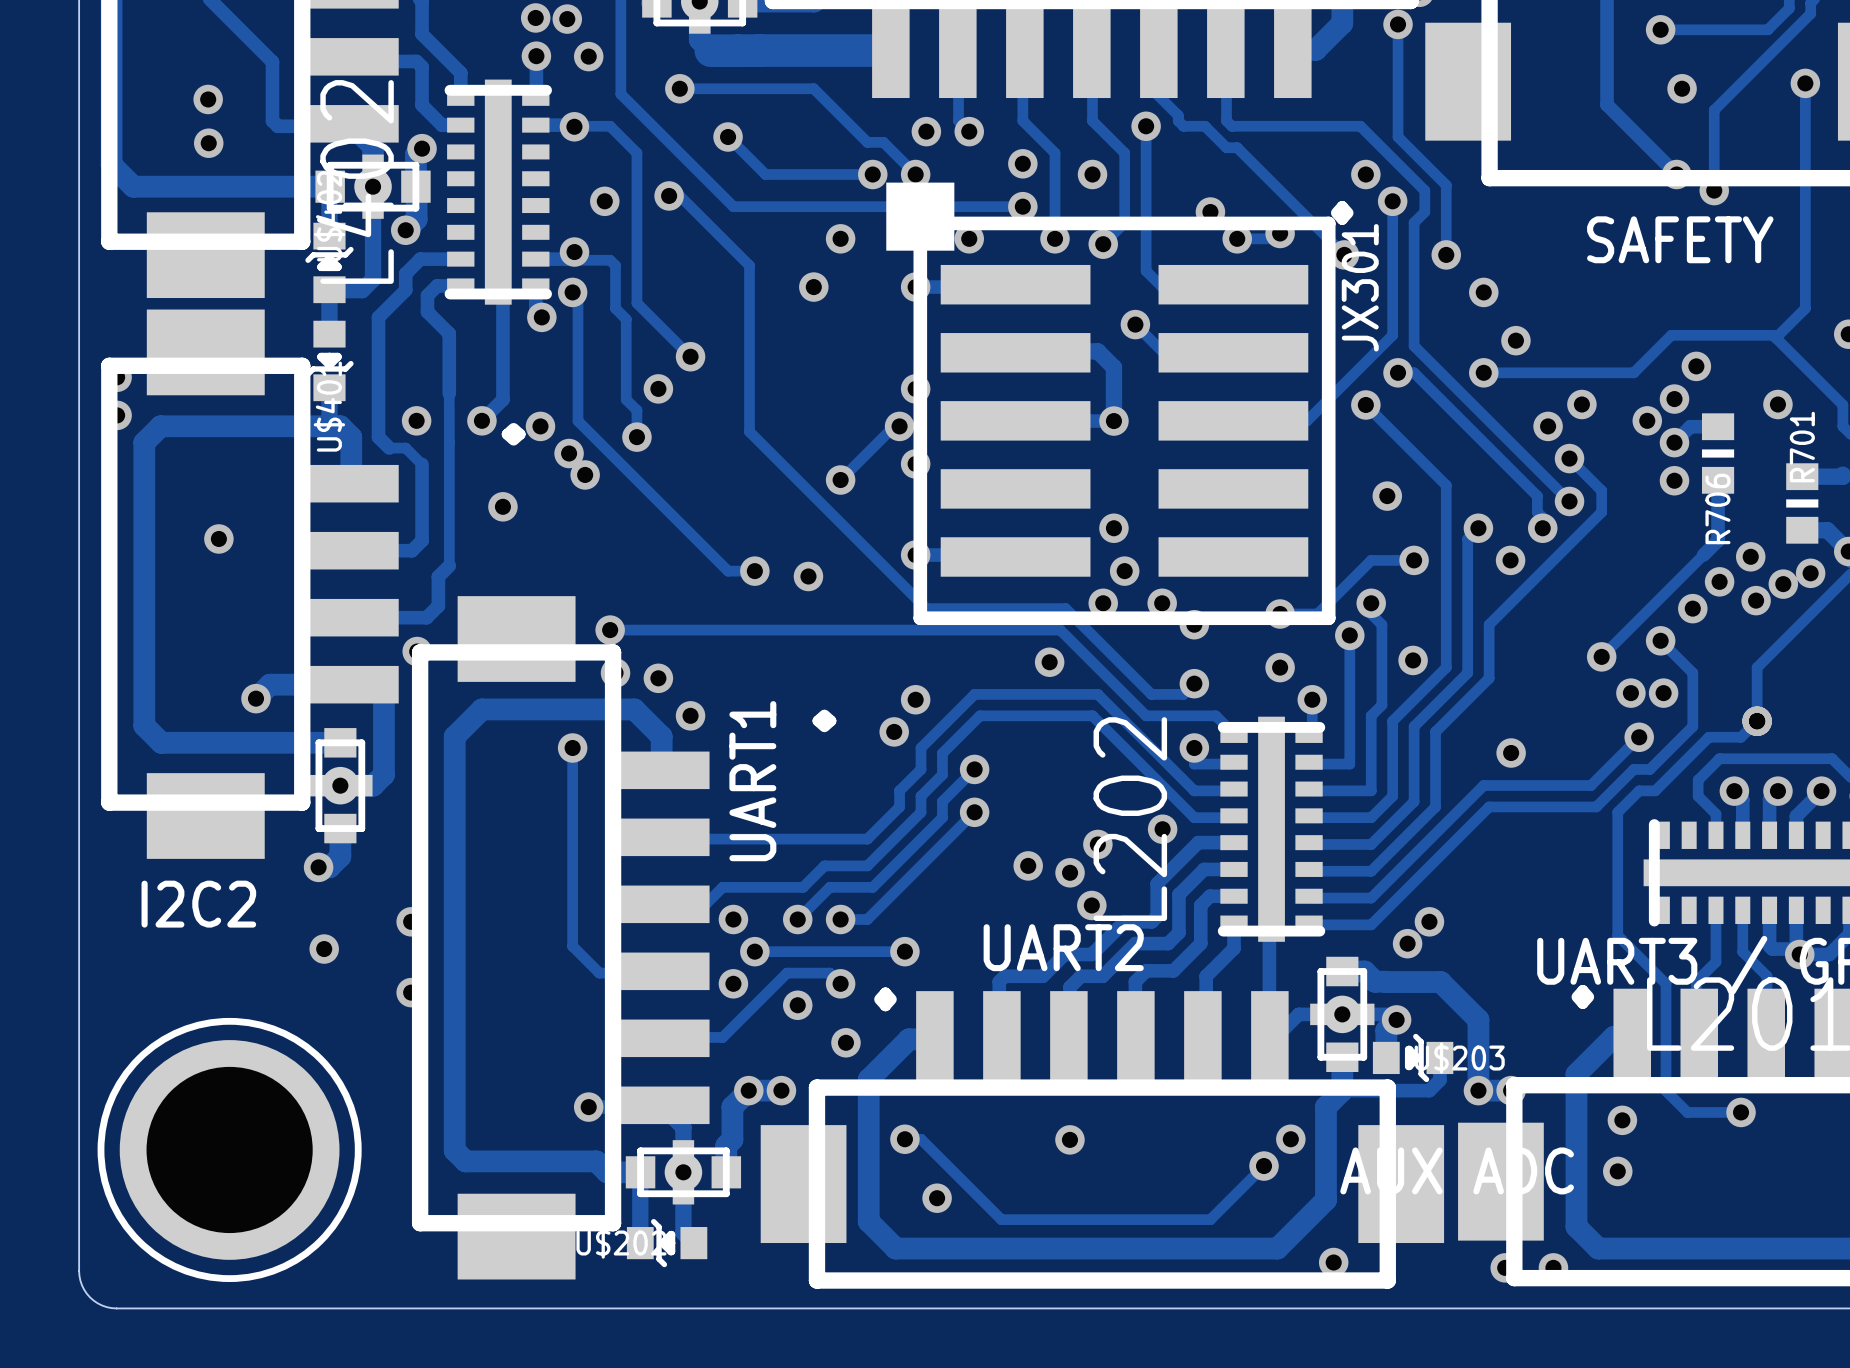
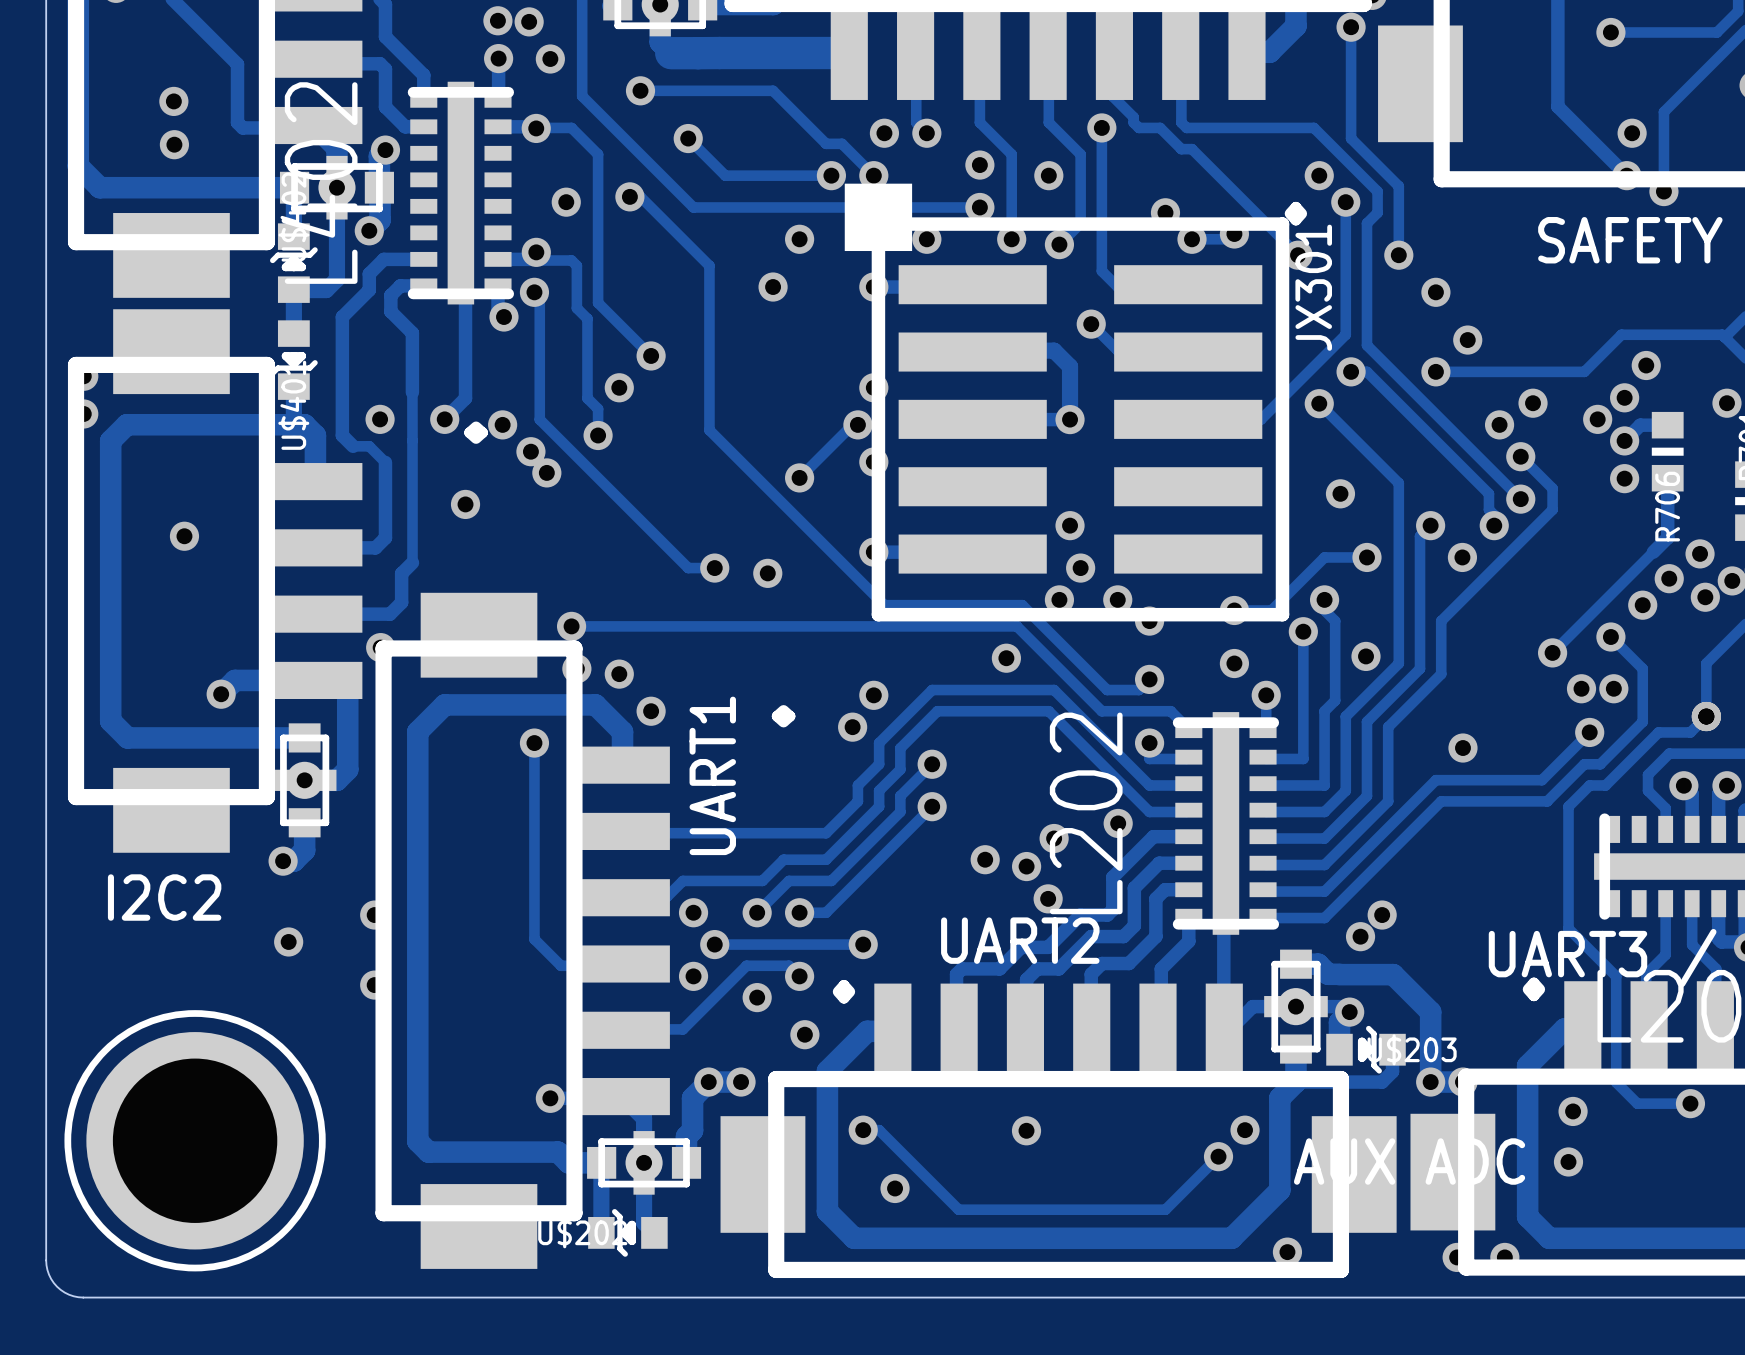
via position: (1682, 88) -> (1632, 133)

